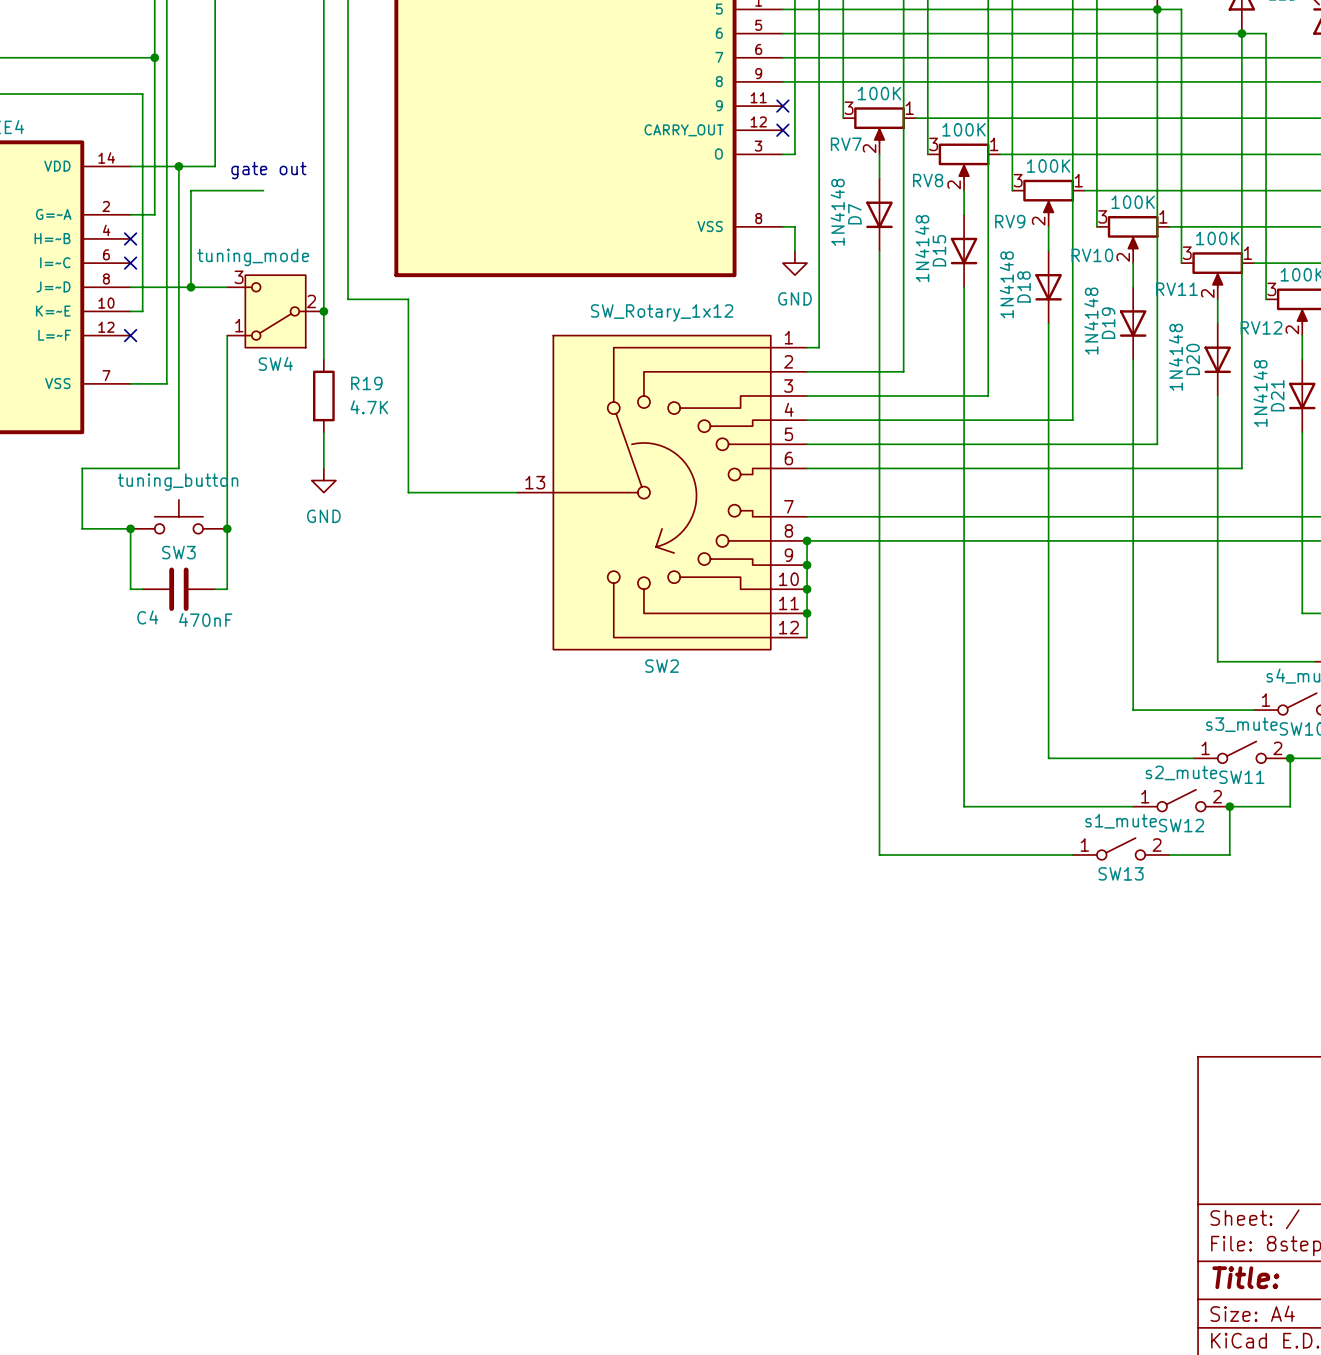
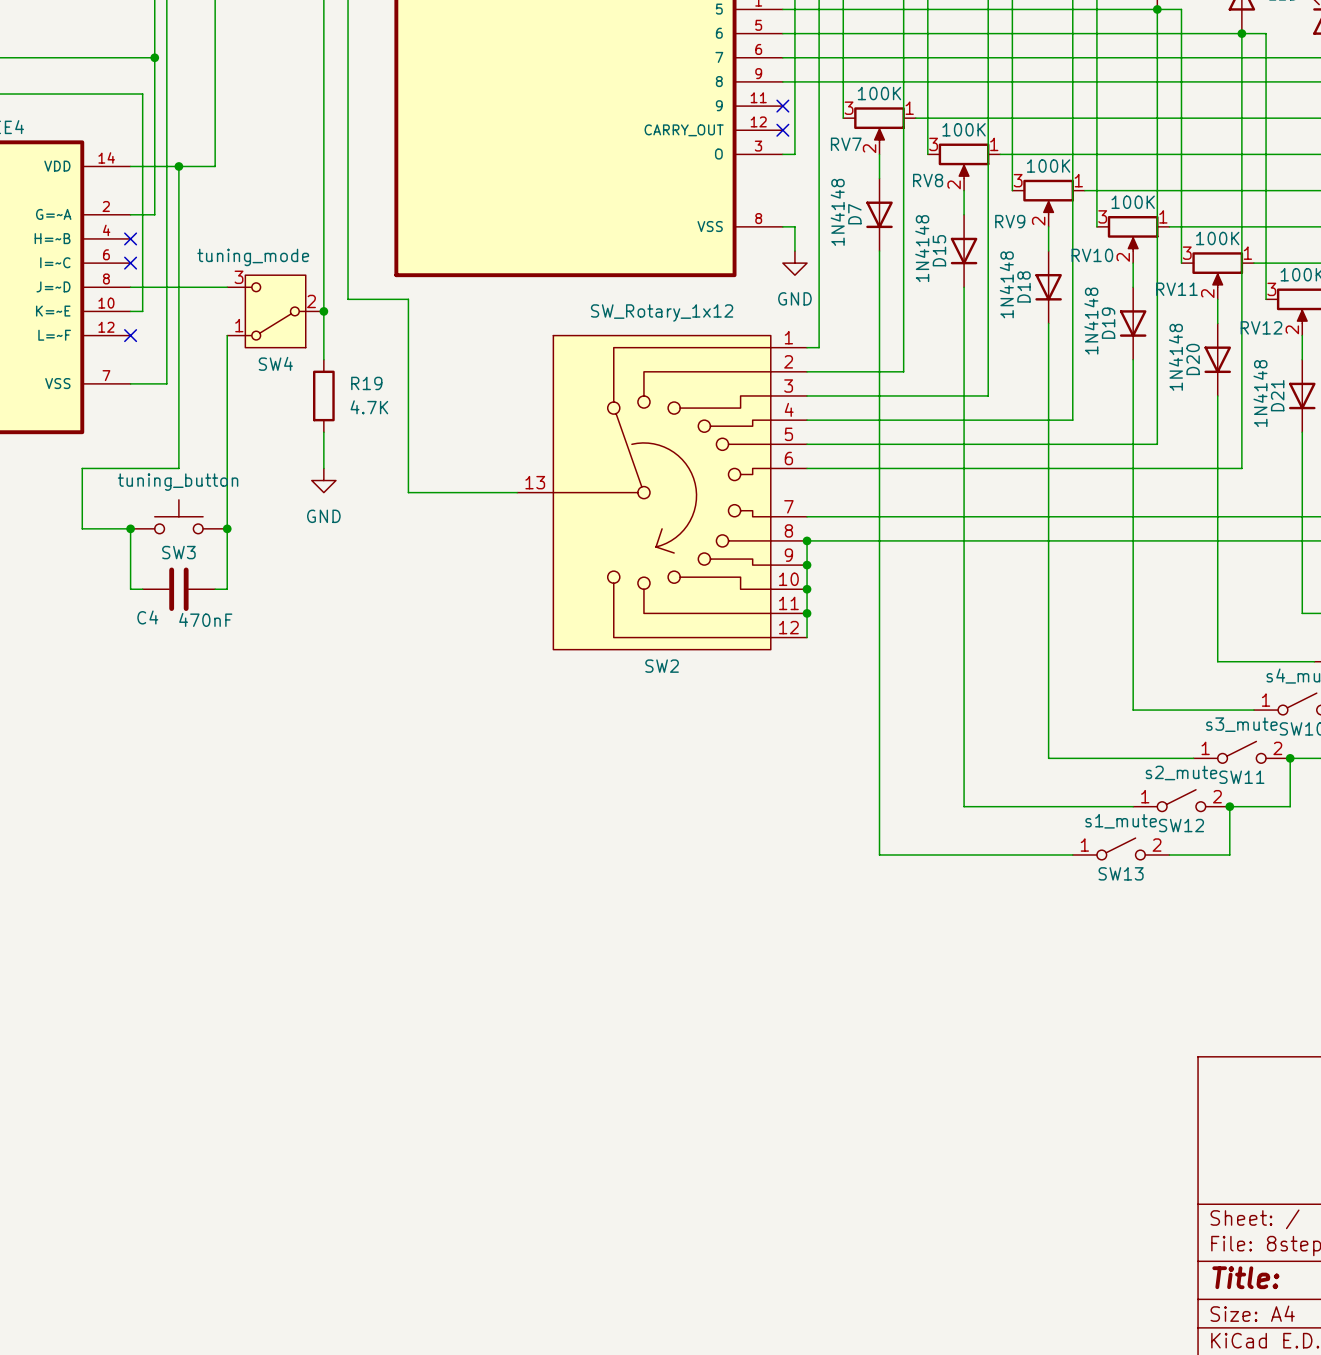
text: gate out (268, 170) -> none
wire: (263, 190) (190, 190) (190, 287) -> none
junction: (190, 287) -> none

